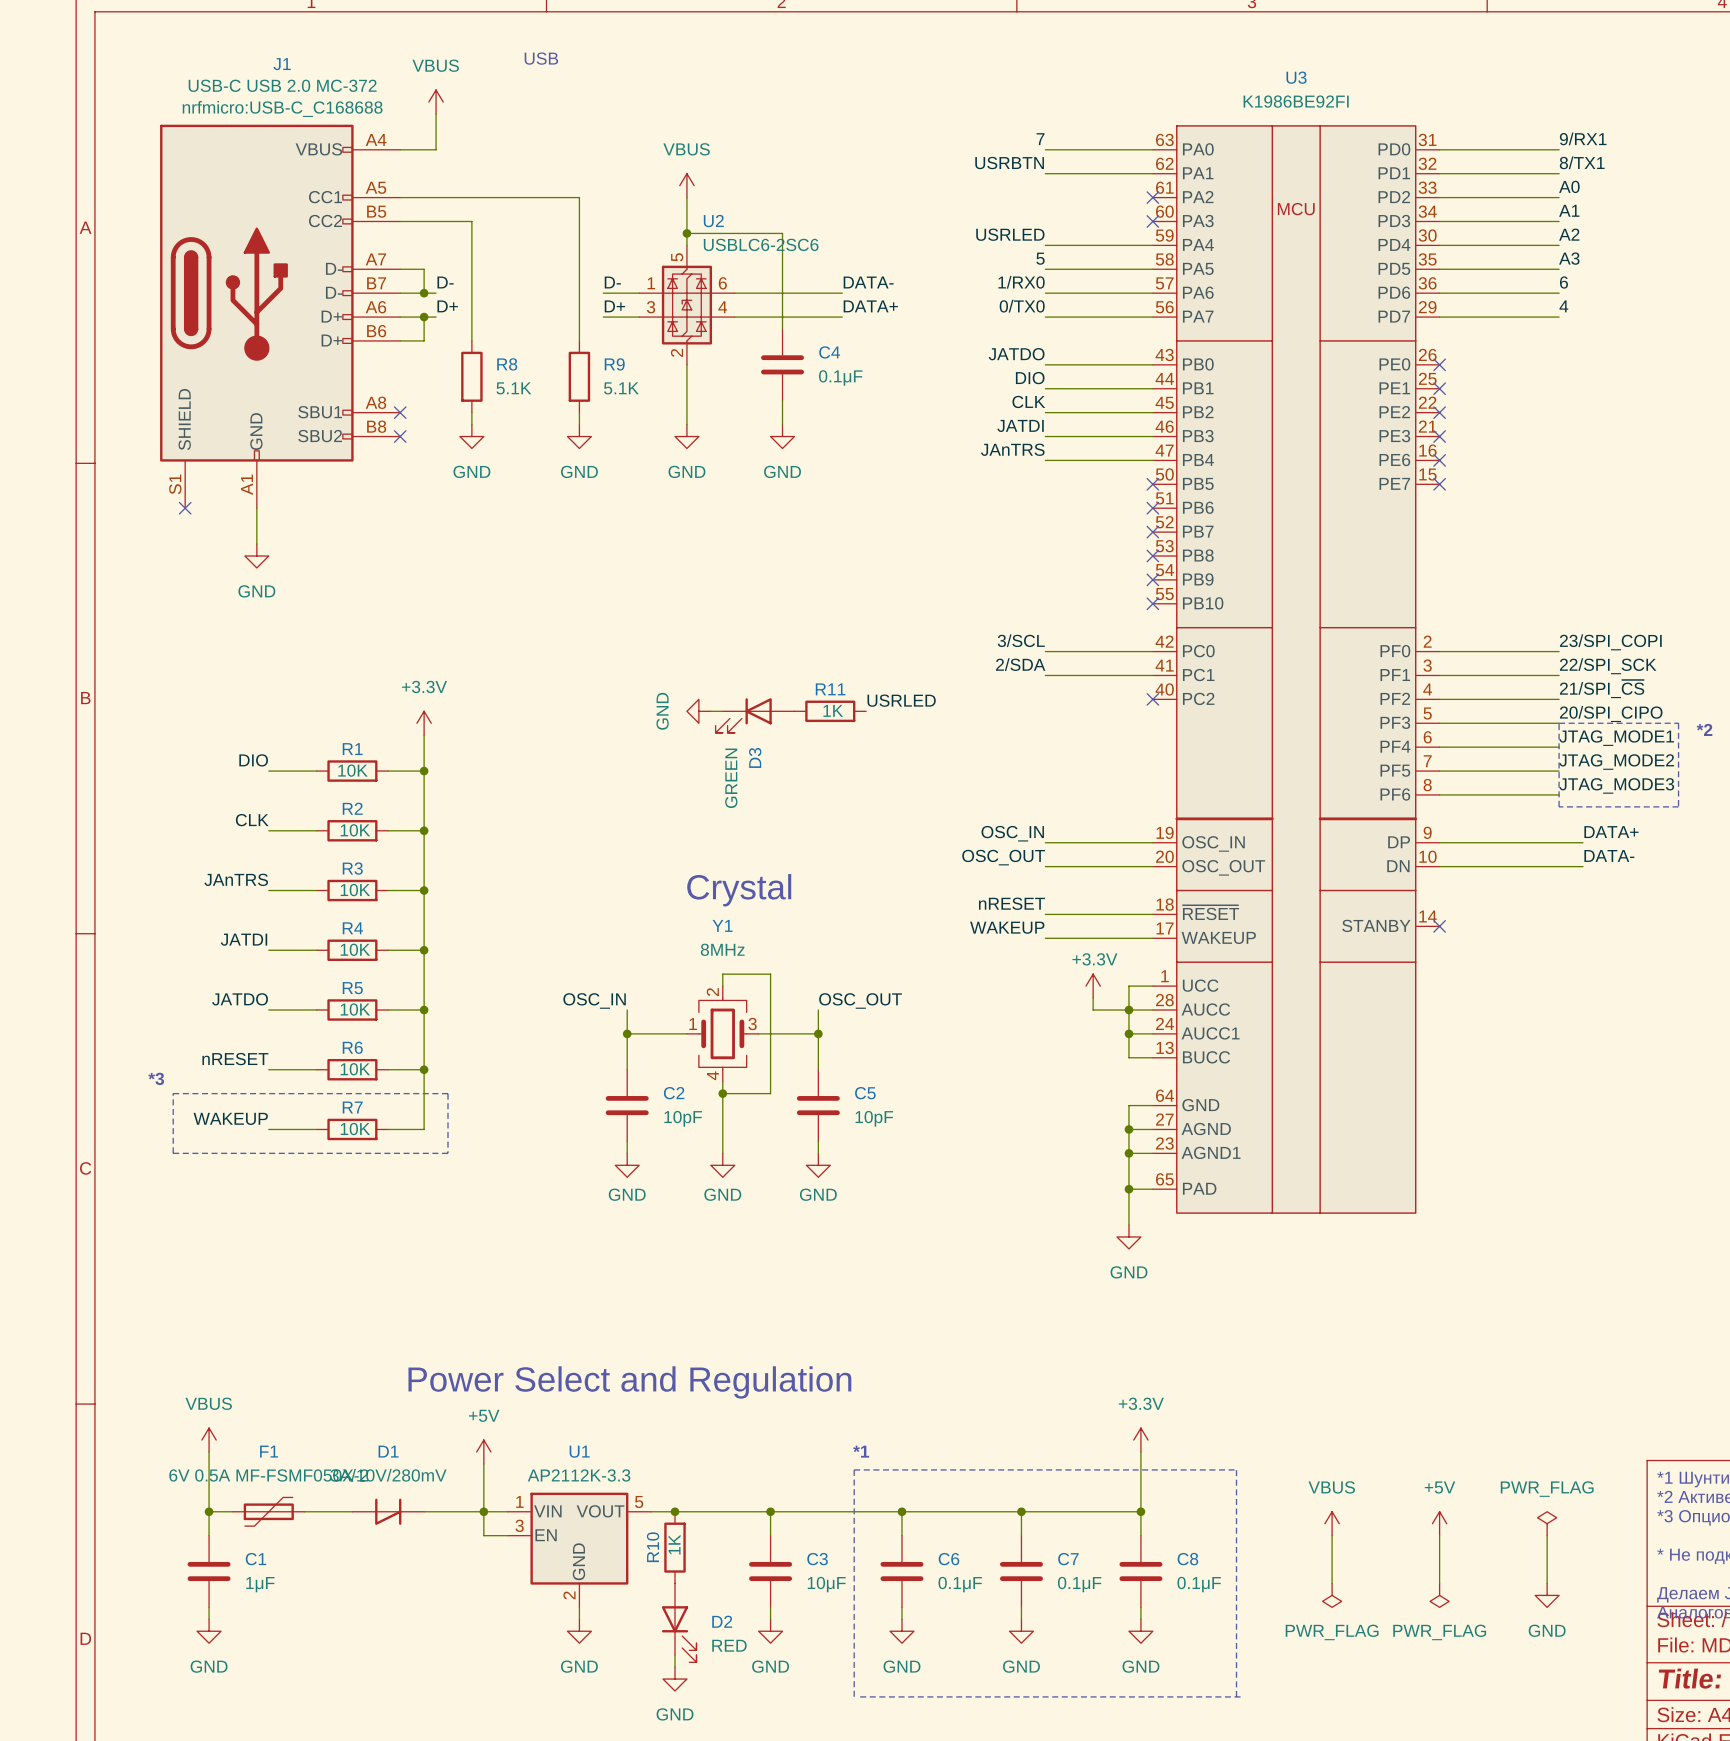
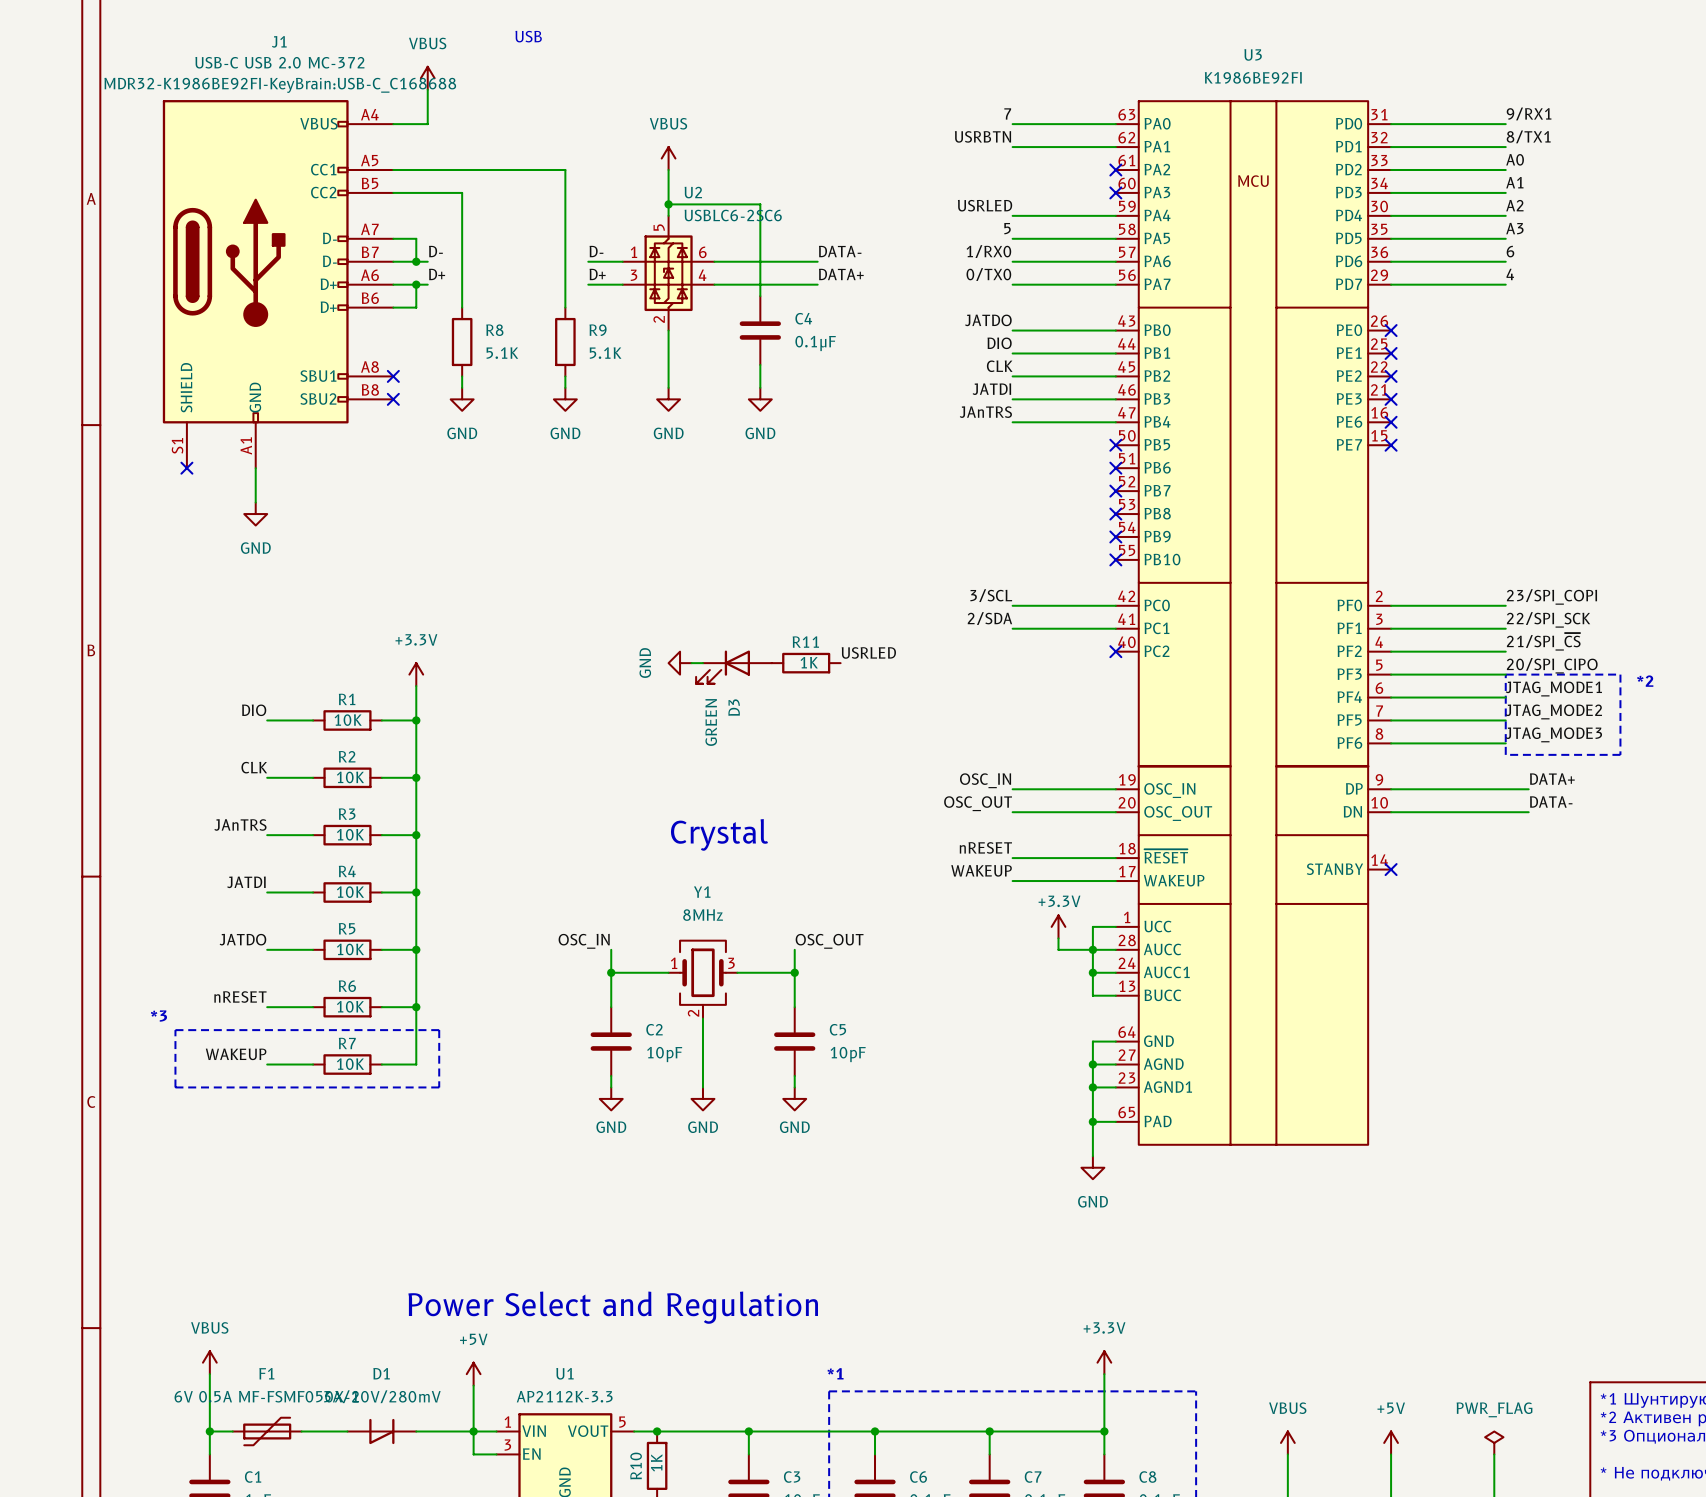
J1 text: nrfmicro:USB-C_C168688 (282, 108) -> MDR32-K1986BE92FI-KeyBrain:USB-C_C168688 (280, 85)
Y1 symbol: [686, 986, 759, 1082] -> [668, 940, 738, 1019]
wire: (722, 986) (722, 974) (770, 974) (770, 1093) (722, 1093) -> none
junction: (722, 1093) -> none

